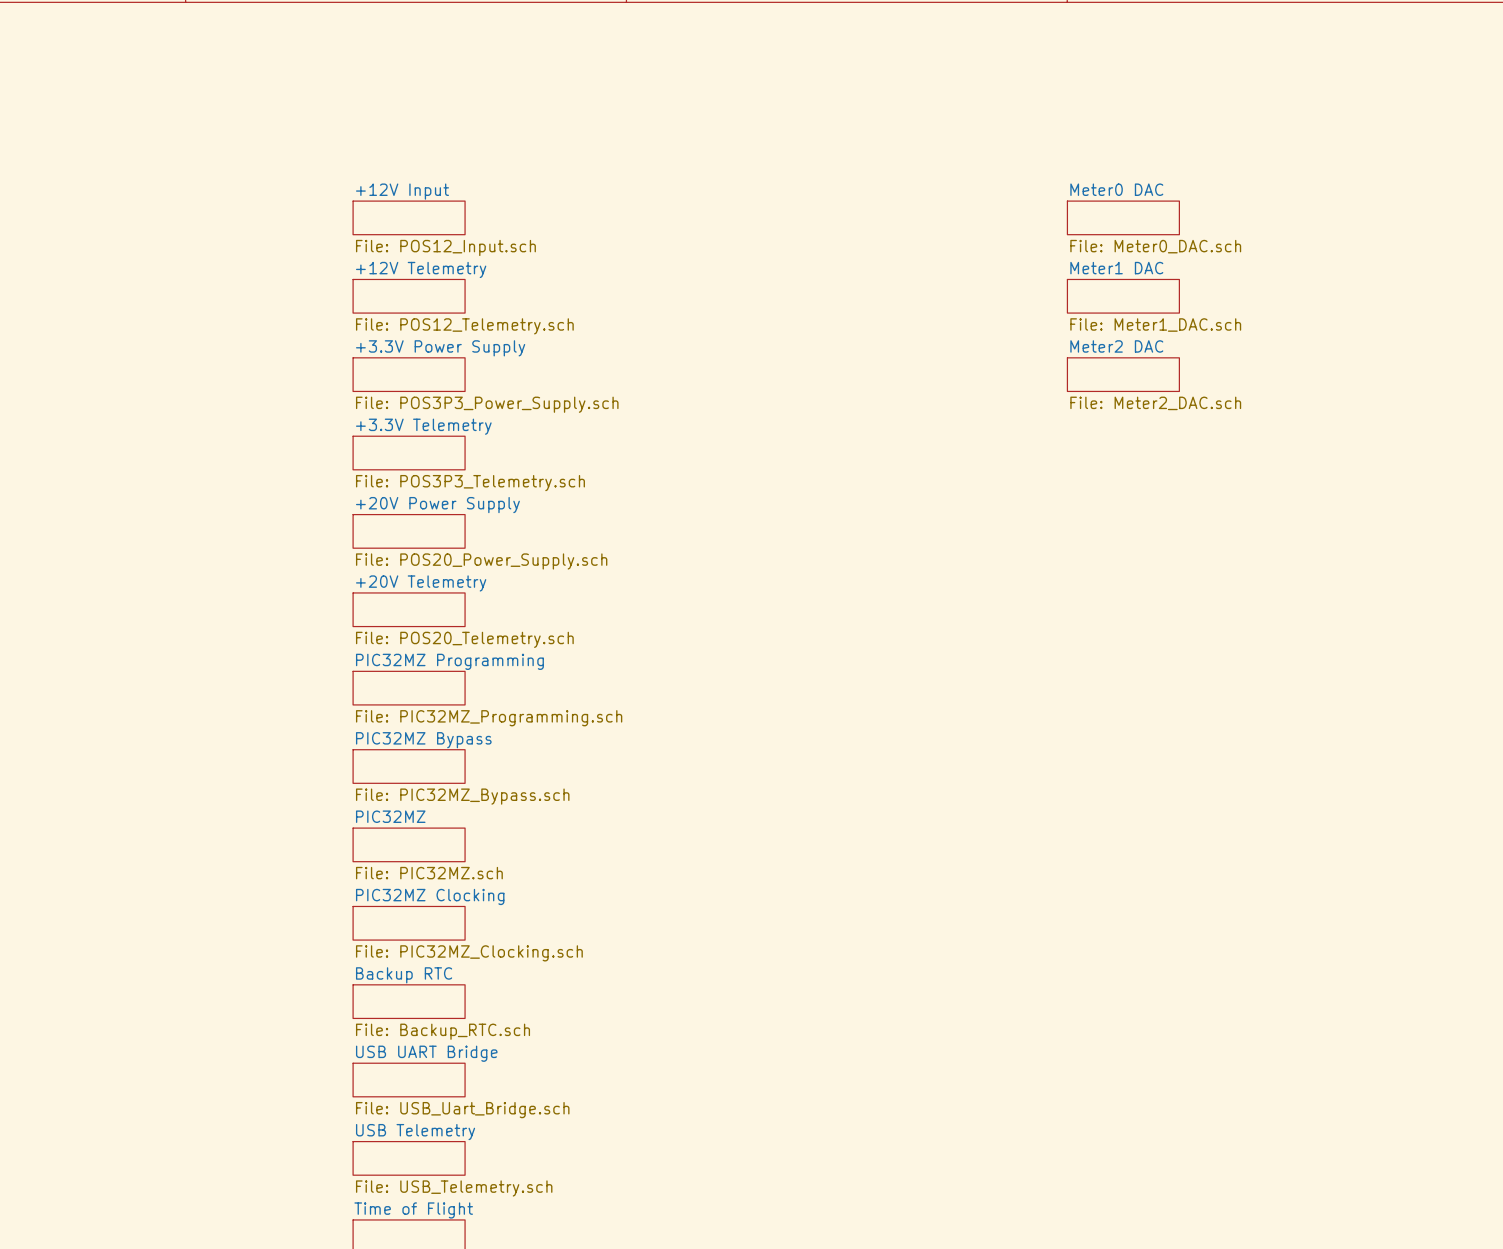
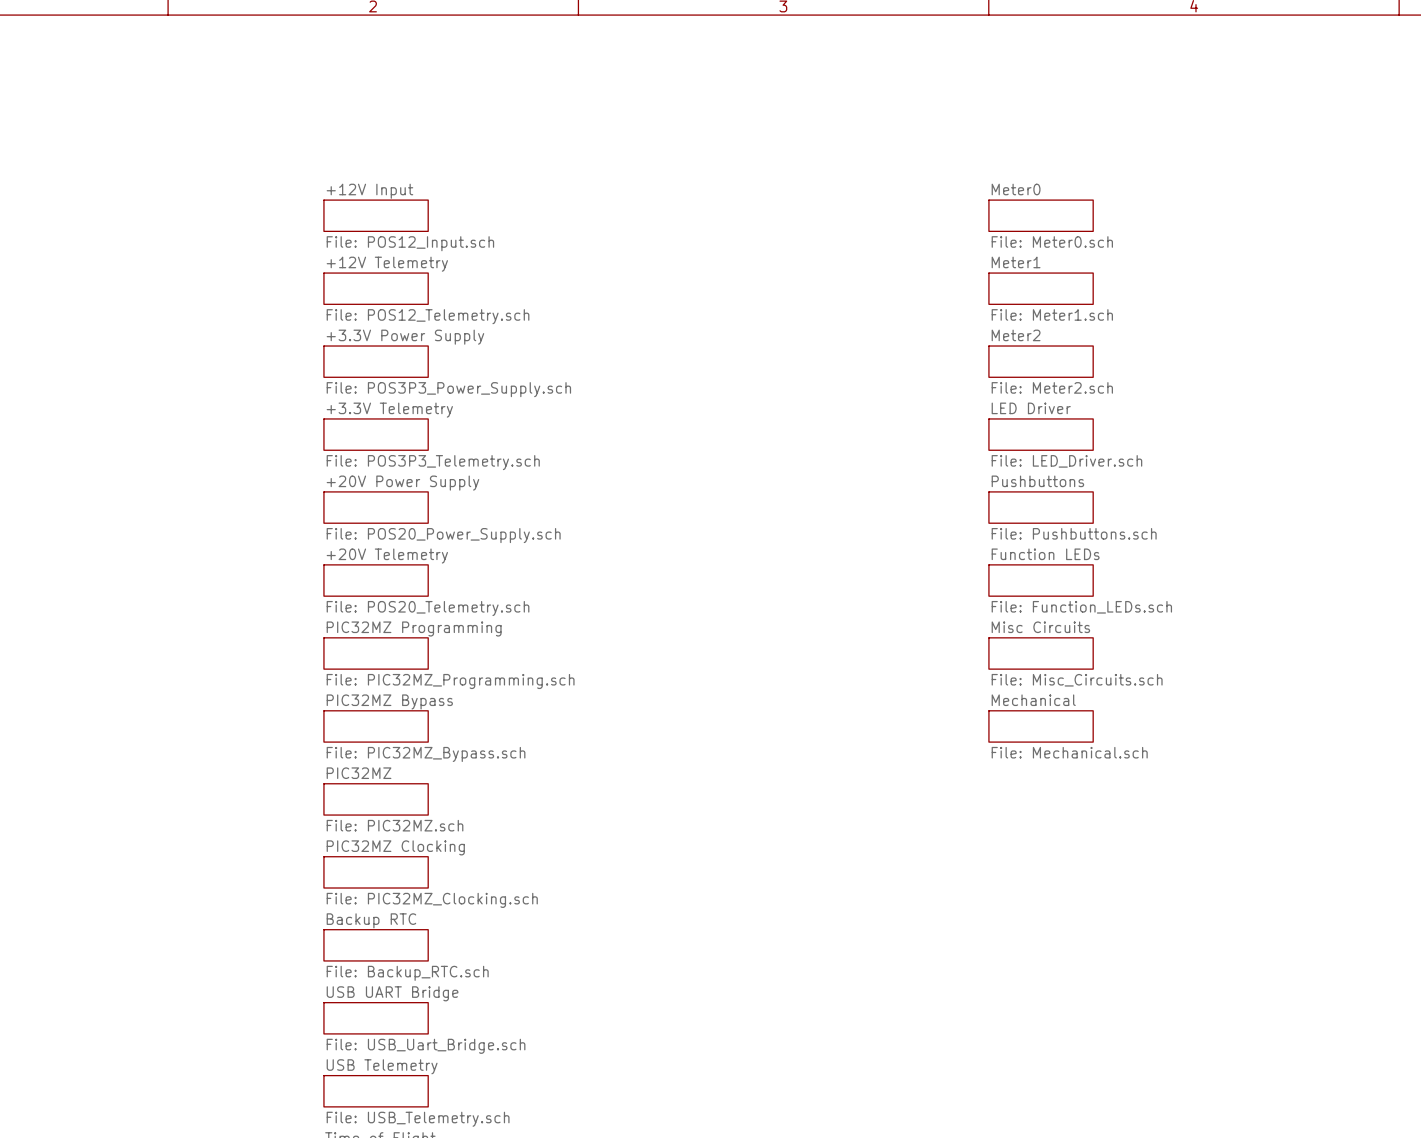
sheet Meter0 DAC name: Meter0 DAC (1116, 189) -> Meter0 (1016, 189)
sheet Meter0 DAC value: File: Meter0_DAC.sch (1155, 246) -> File: Meter0.sch (1052, 241)
sheet Meter1 DAC name: Meter1 DAC (1116, 268) -> Meter1 (1016, 262)
sheet Meter1 DAC value: File: Meter1_DAC.sch (1155, 325) -> File: Meter1.sch (1052, 314)
sheet Meter2 DAC name: Meter2 DAC (1116, 346) -> Meter2 (1016, 335)
sheet Meter2 DAC value: File: Meter2_DAC.sch (1155, 403) -> File: Meter2.sch (1052, 387)
sheet LED Driver: none -> File: LED_Driver.sch (1041, 434)
sheet Pushbuttons: none -> File: Pushbuttons.sch (1041, 507)
sheet Function LEDs: none -> File: Function_LEDs.sch (1041, 580)
sheet Misc Circuits: none -> File: Misc_Circuits.sch (1041, 653)
sheet Mechanical: none -> File: Mechanical.sch (1041, 726)

